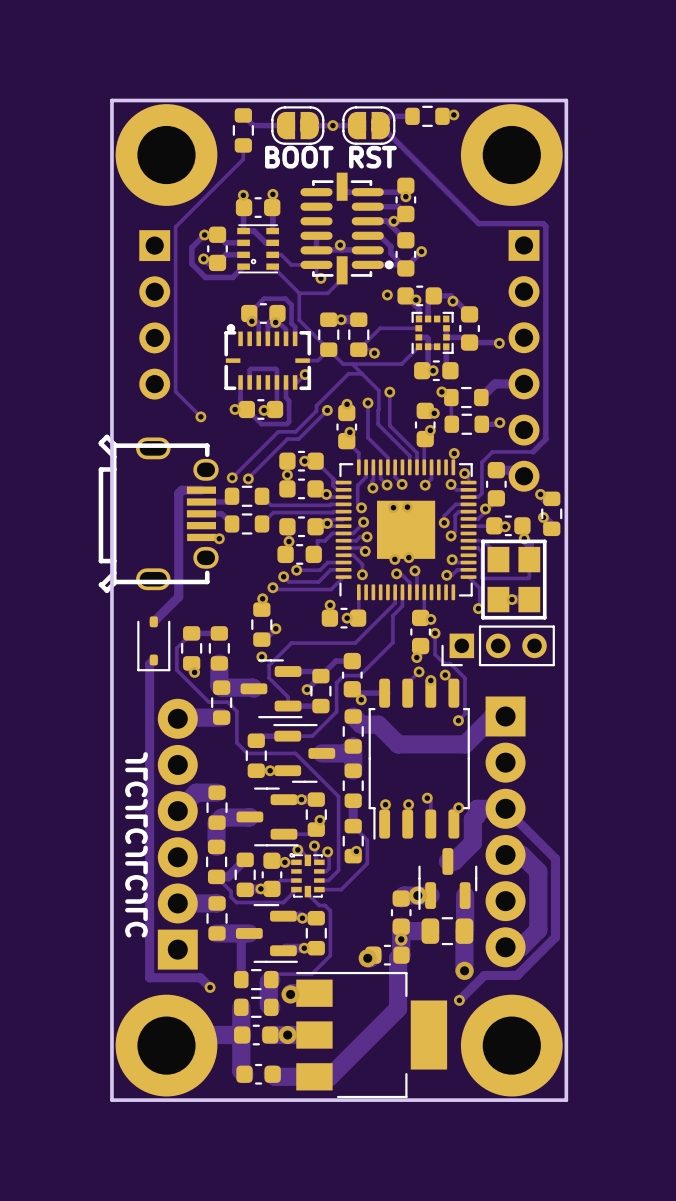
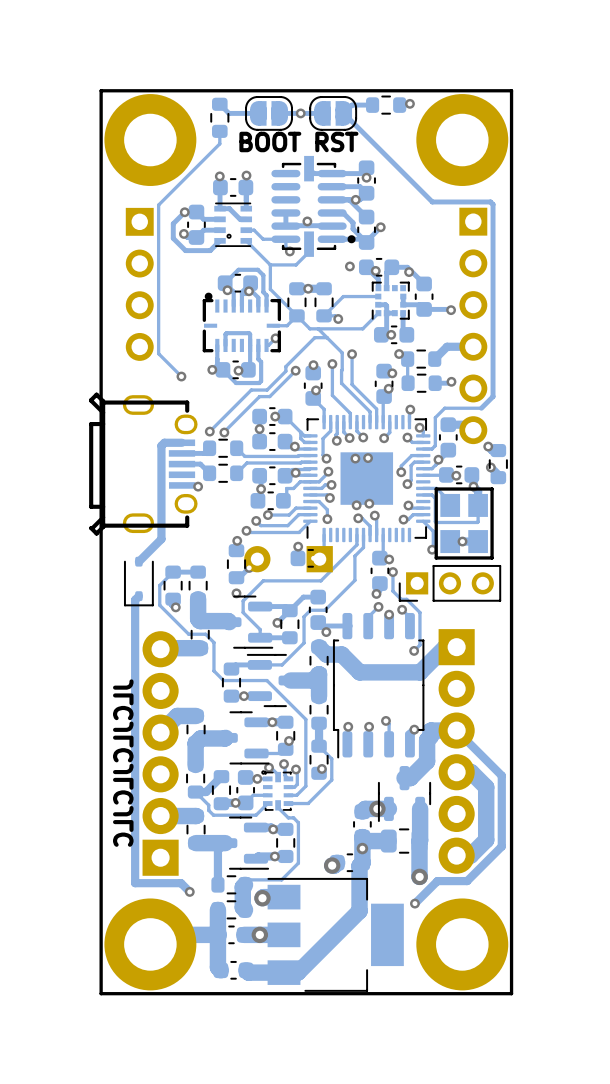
part: none -> (288, 559)

